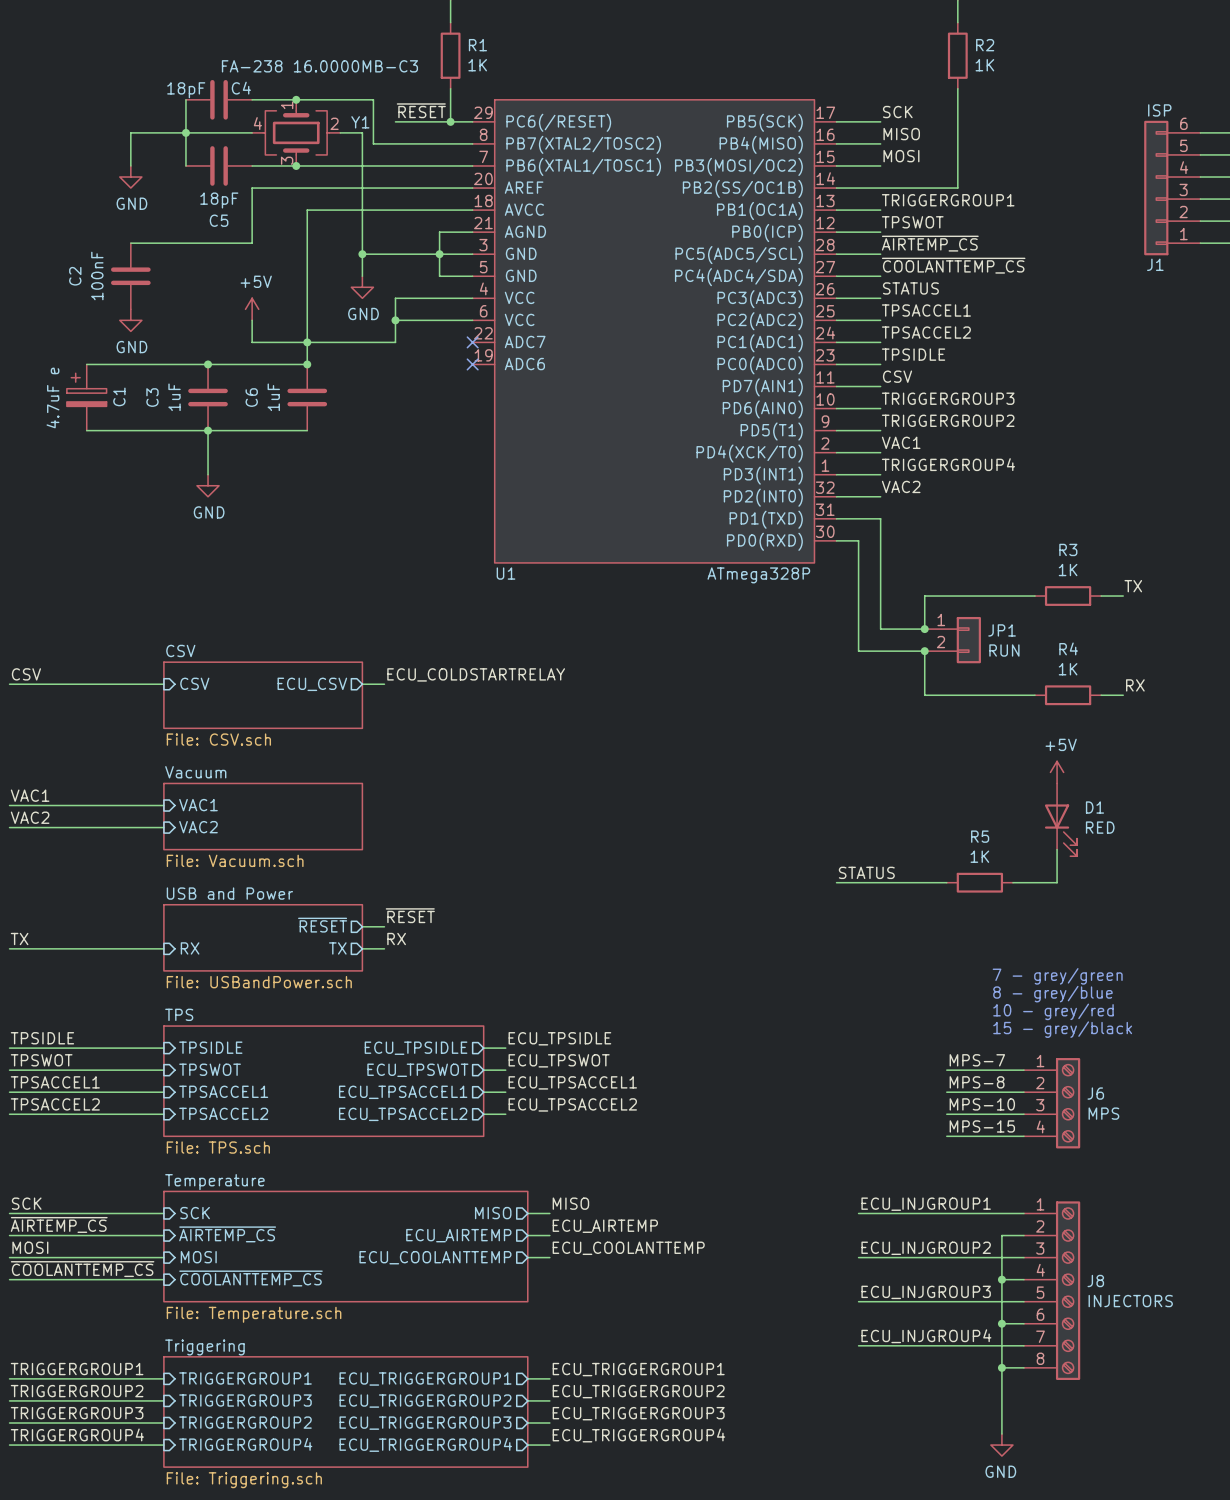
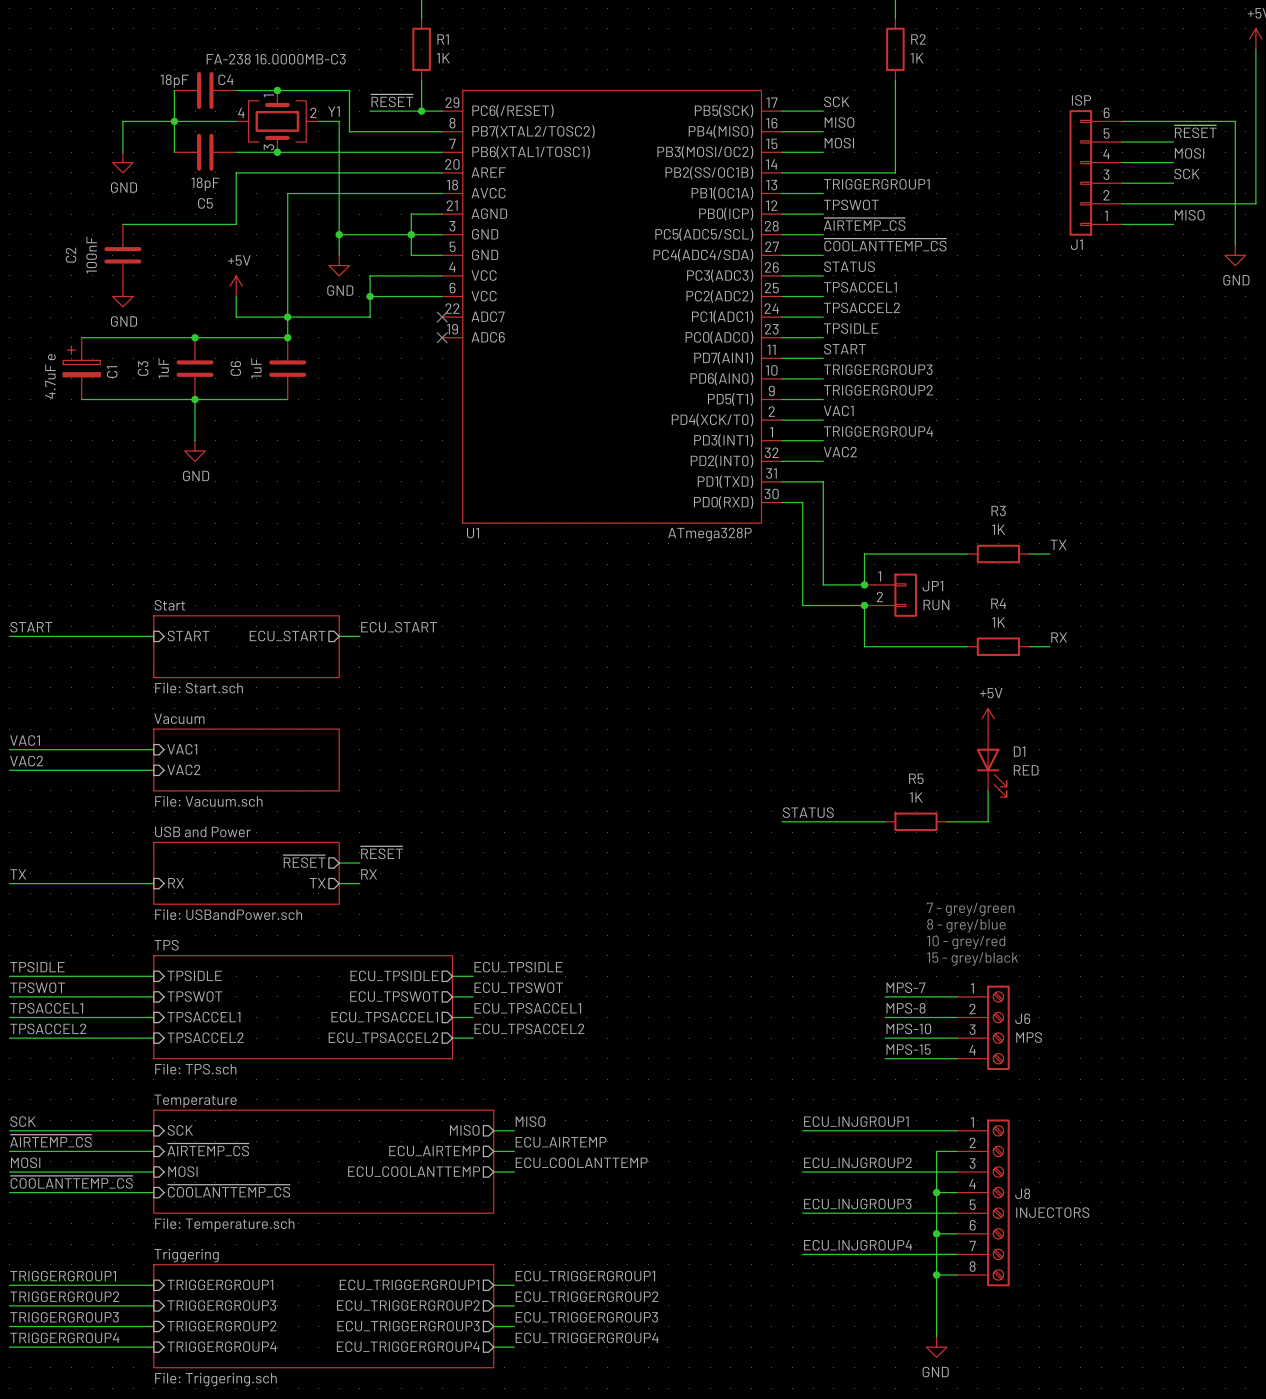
label: CSV (897, 376) -> START (845, 349)
sheet CSV name: CSV (180, 650) -> Start (169, 605)
label: CSV (26, 674) -> START (31, 627)
label: ECU_COLDSTARTRELAY (476, 674) -> ECU_START (399, 627)
sheet pin: CSV (194, 683) -> START (188, 636)
sheet pin: ECU_CSV (312, 684) -> ECU_START (287, 636)
sheet CSV value: File: CSV.sch (218, 739) -> File: Start.sch (199, 688)

